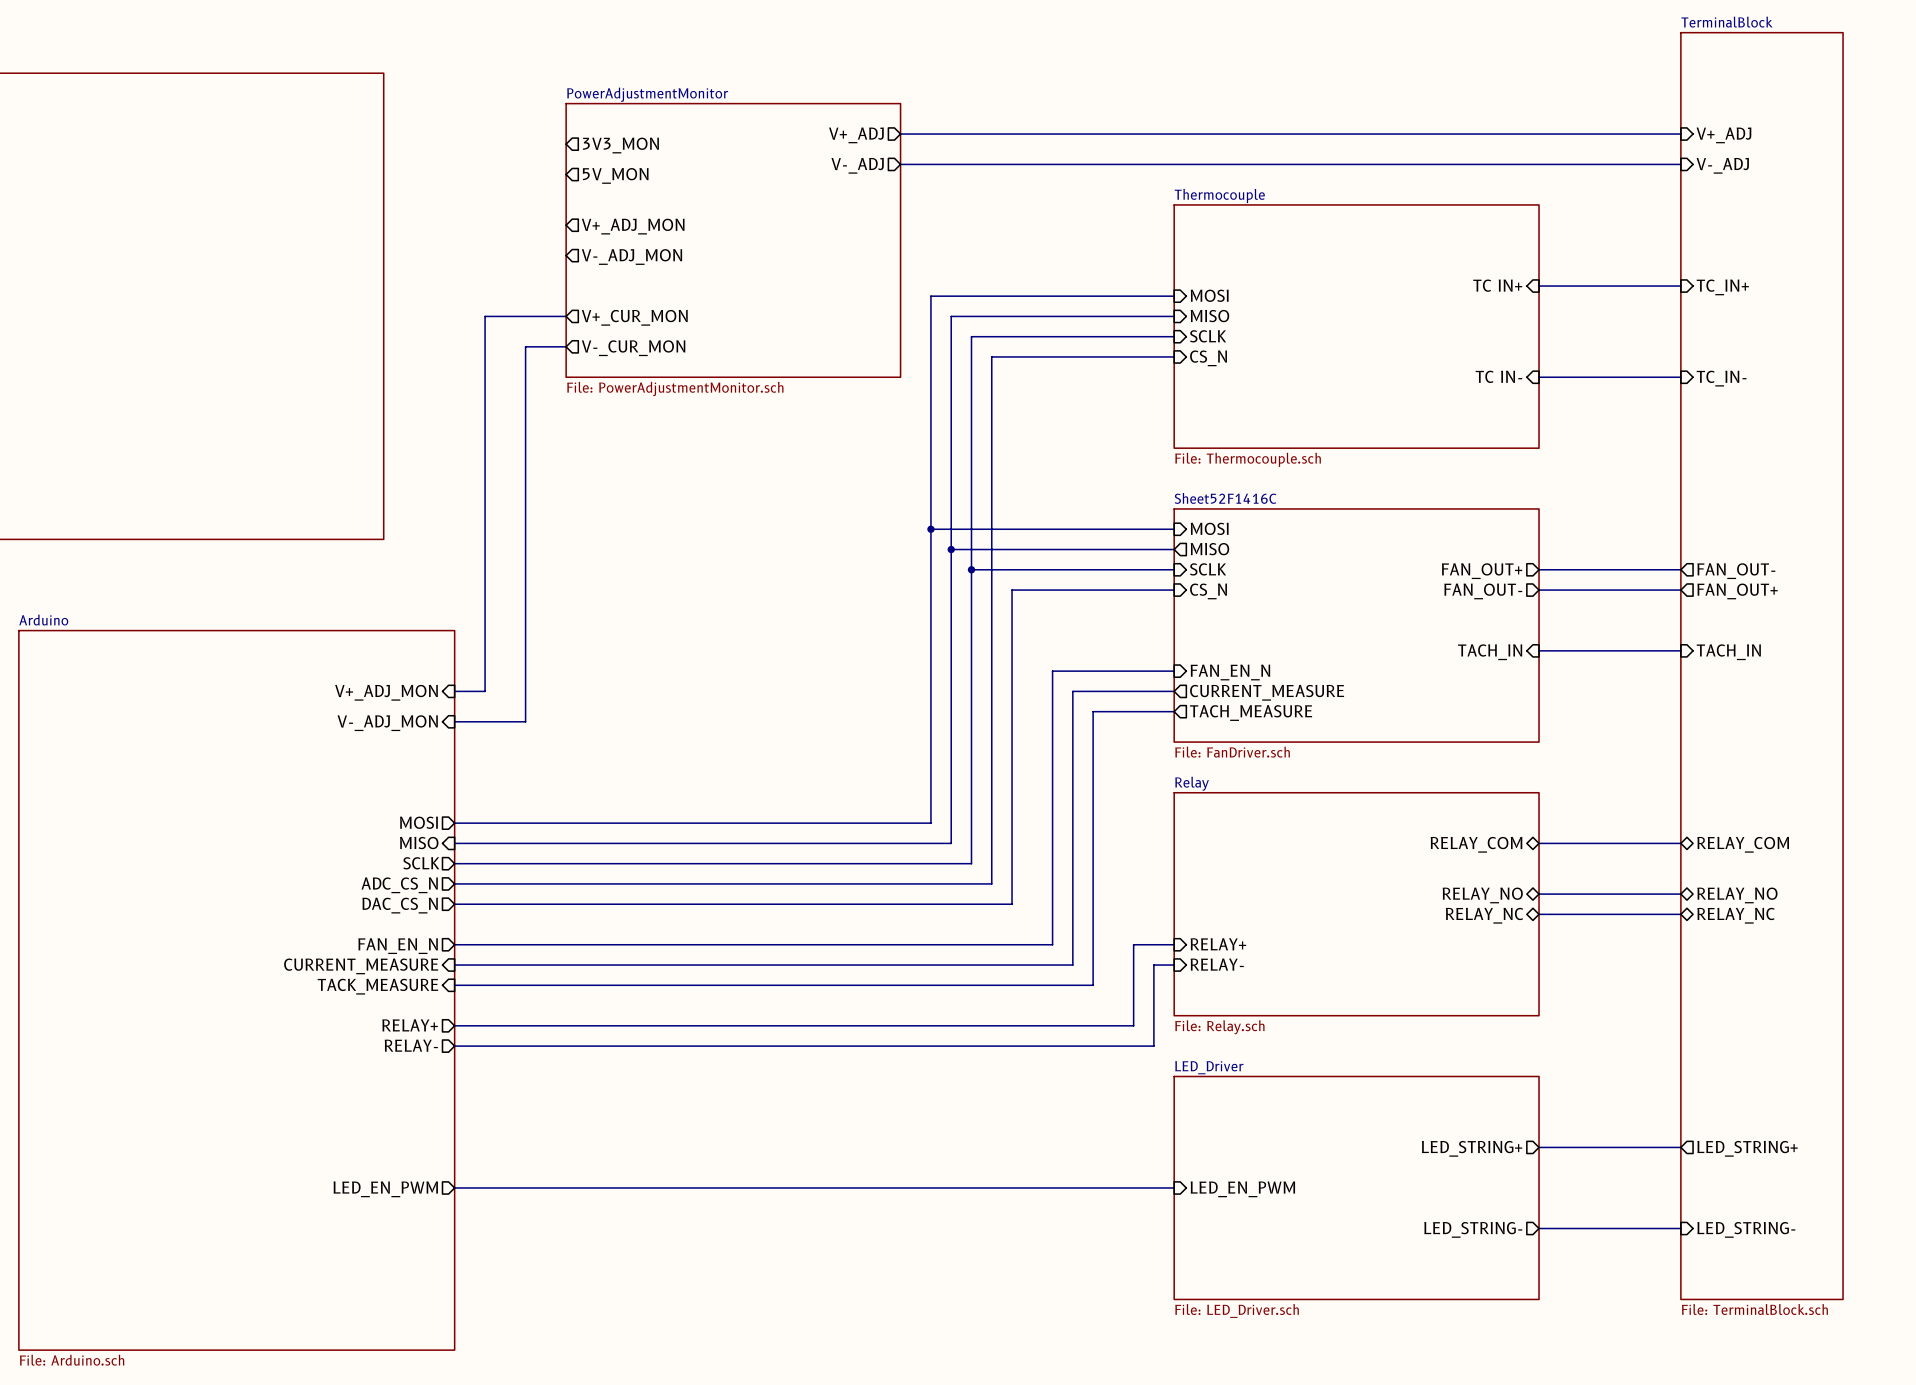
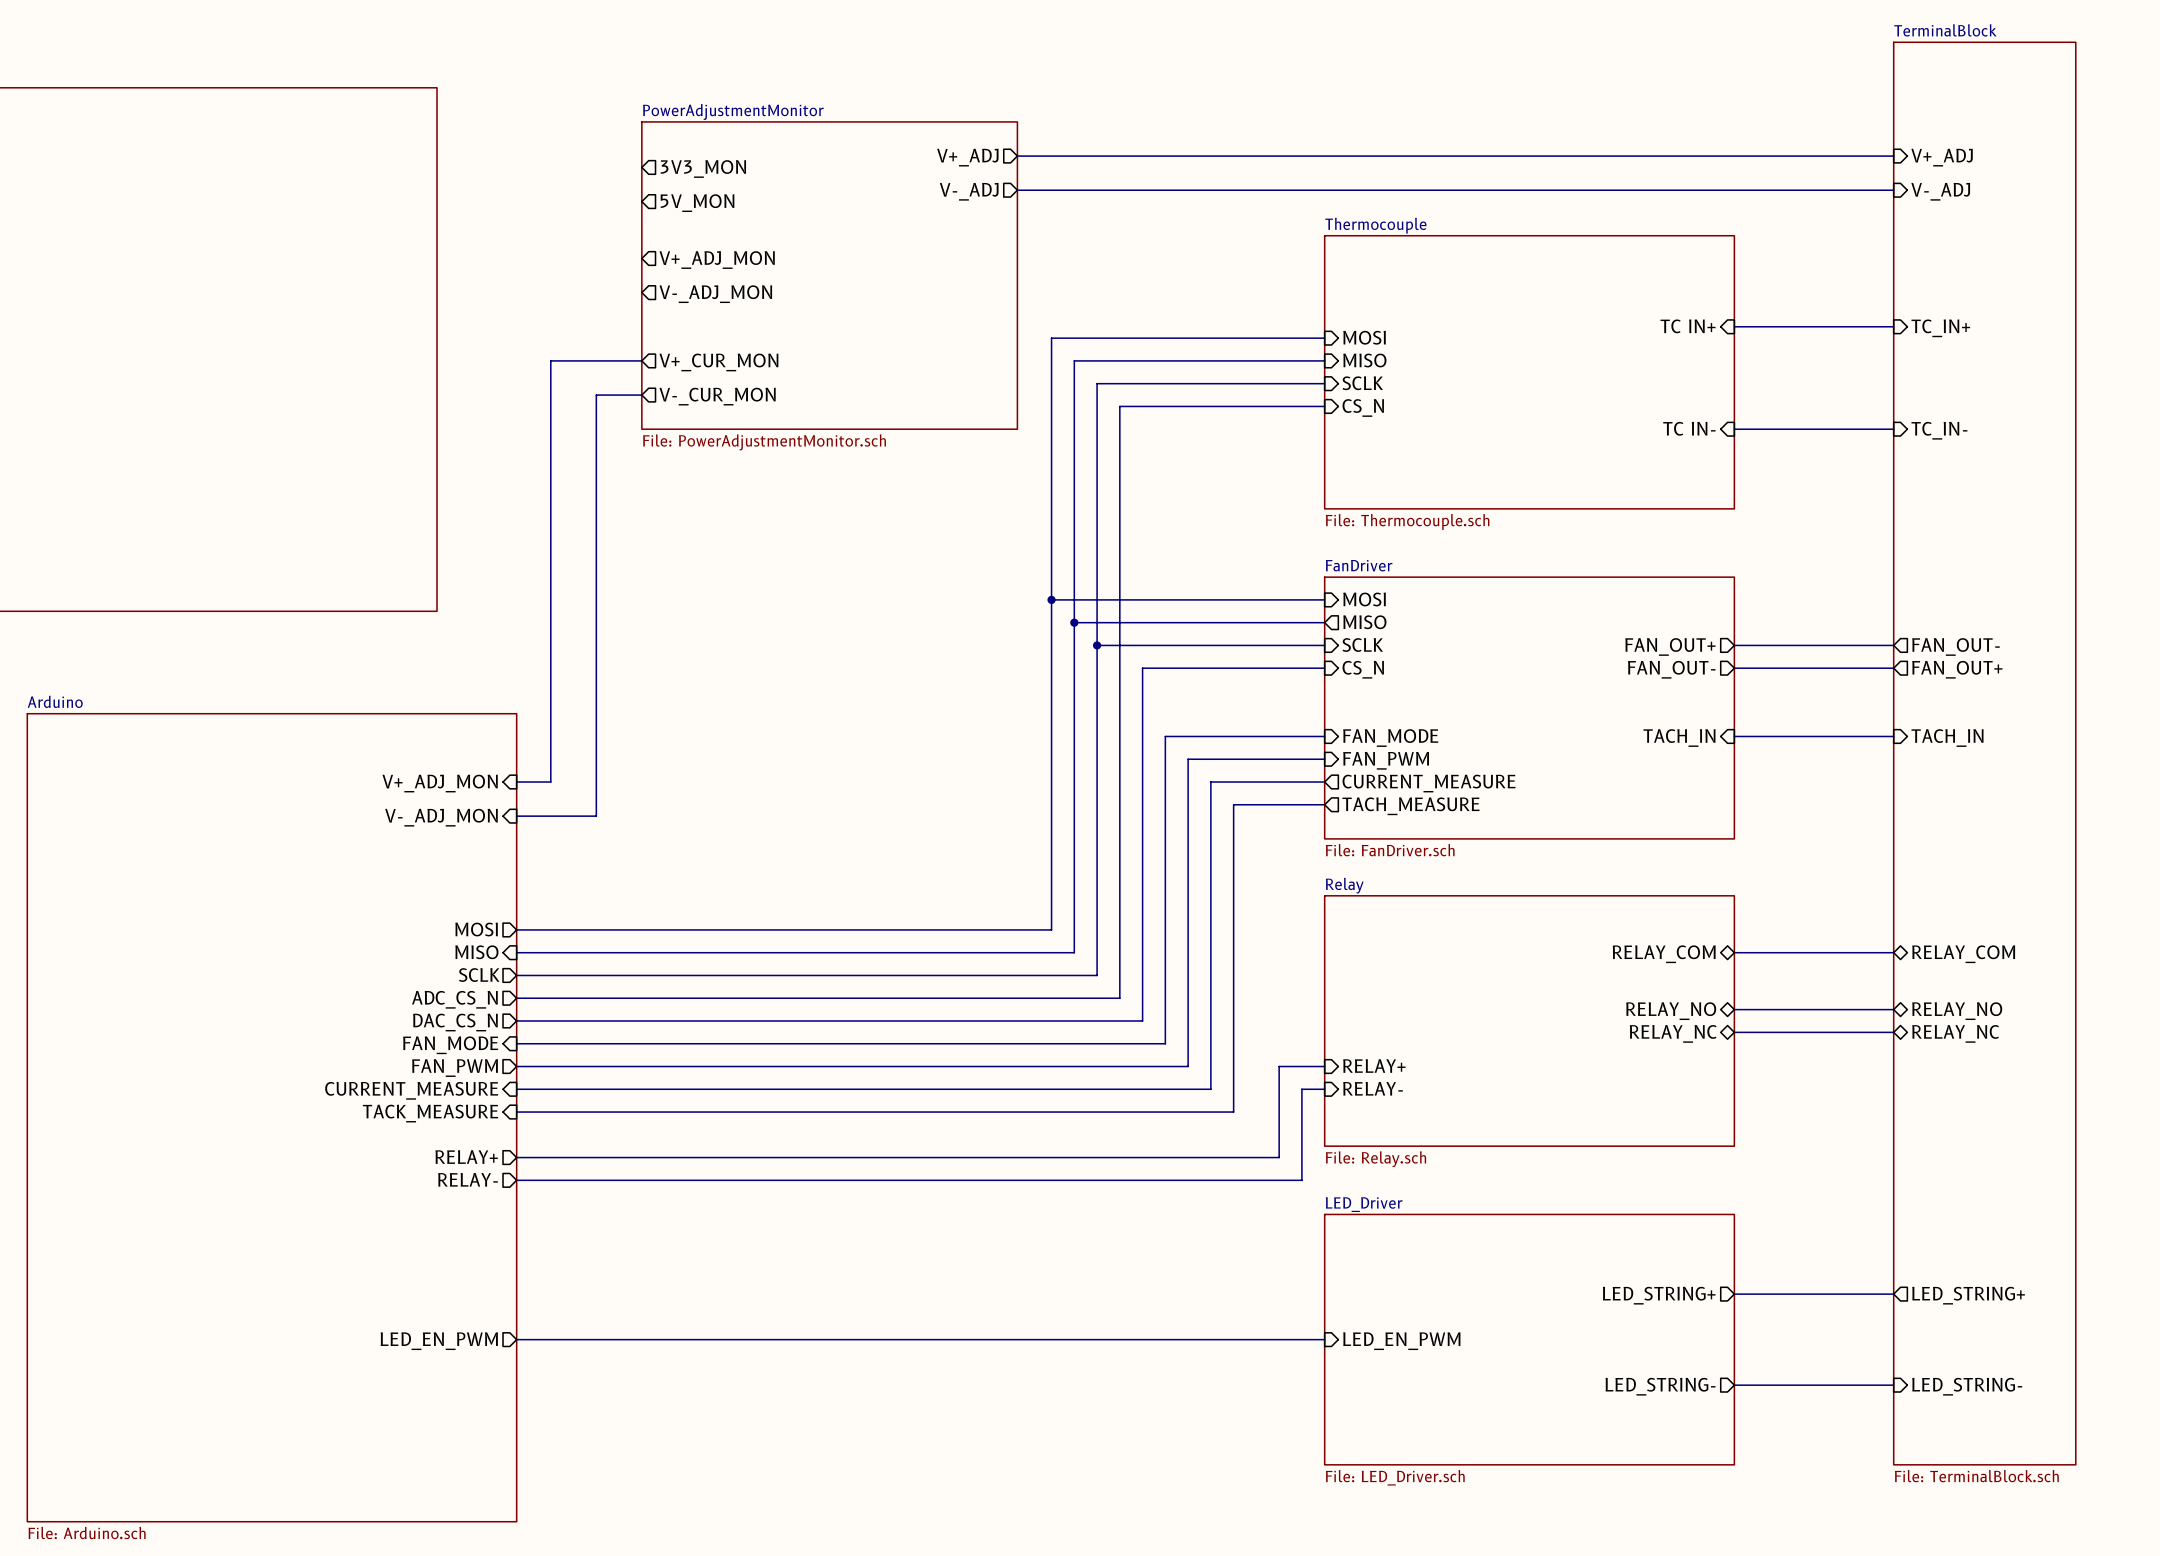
sheet Sheet52F1416C name: Sheet52F1416C (1225, 498) -> FanDriver (1359, 565)
wire: none -> (1324, 736) (1165, 736) (1165, 1043) (516, 1043)
sheet pin: none -> FAN_MODE (1390, 738)
sheet pin: FAN_EN_N (1230, 672) -> FAN_PWM (1386, 760)
sheet pin: none -> FAN_MODE (450, 1045)
sheet pin: FAN_EN_N (398, 946) -> FAN_PWM (454, 1068)

